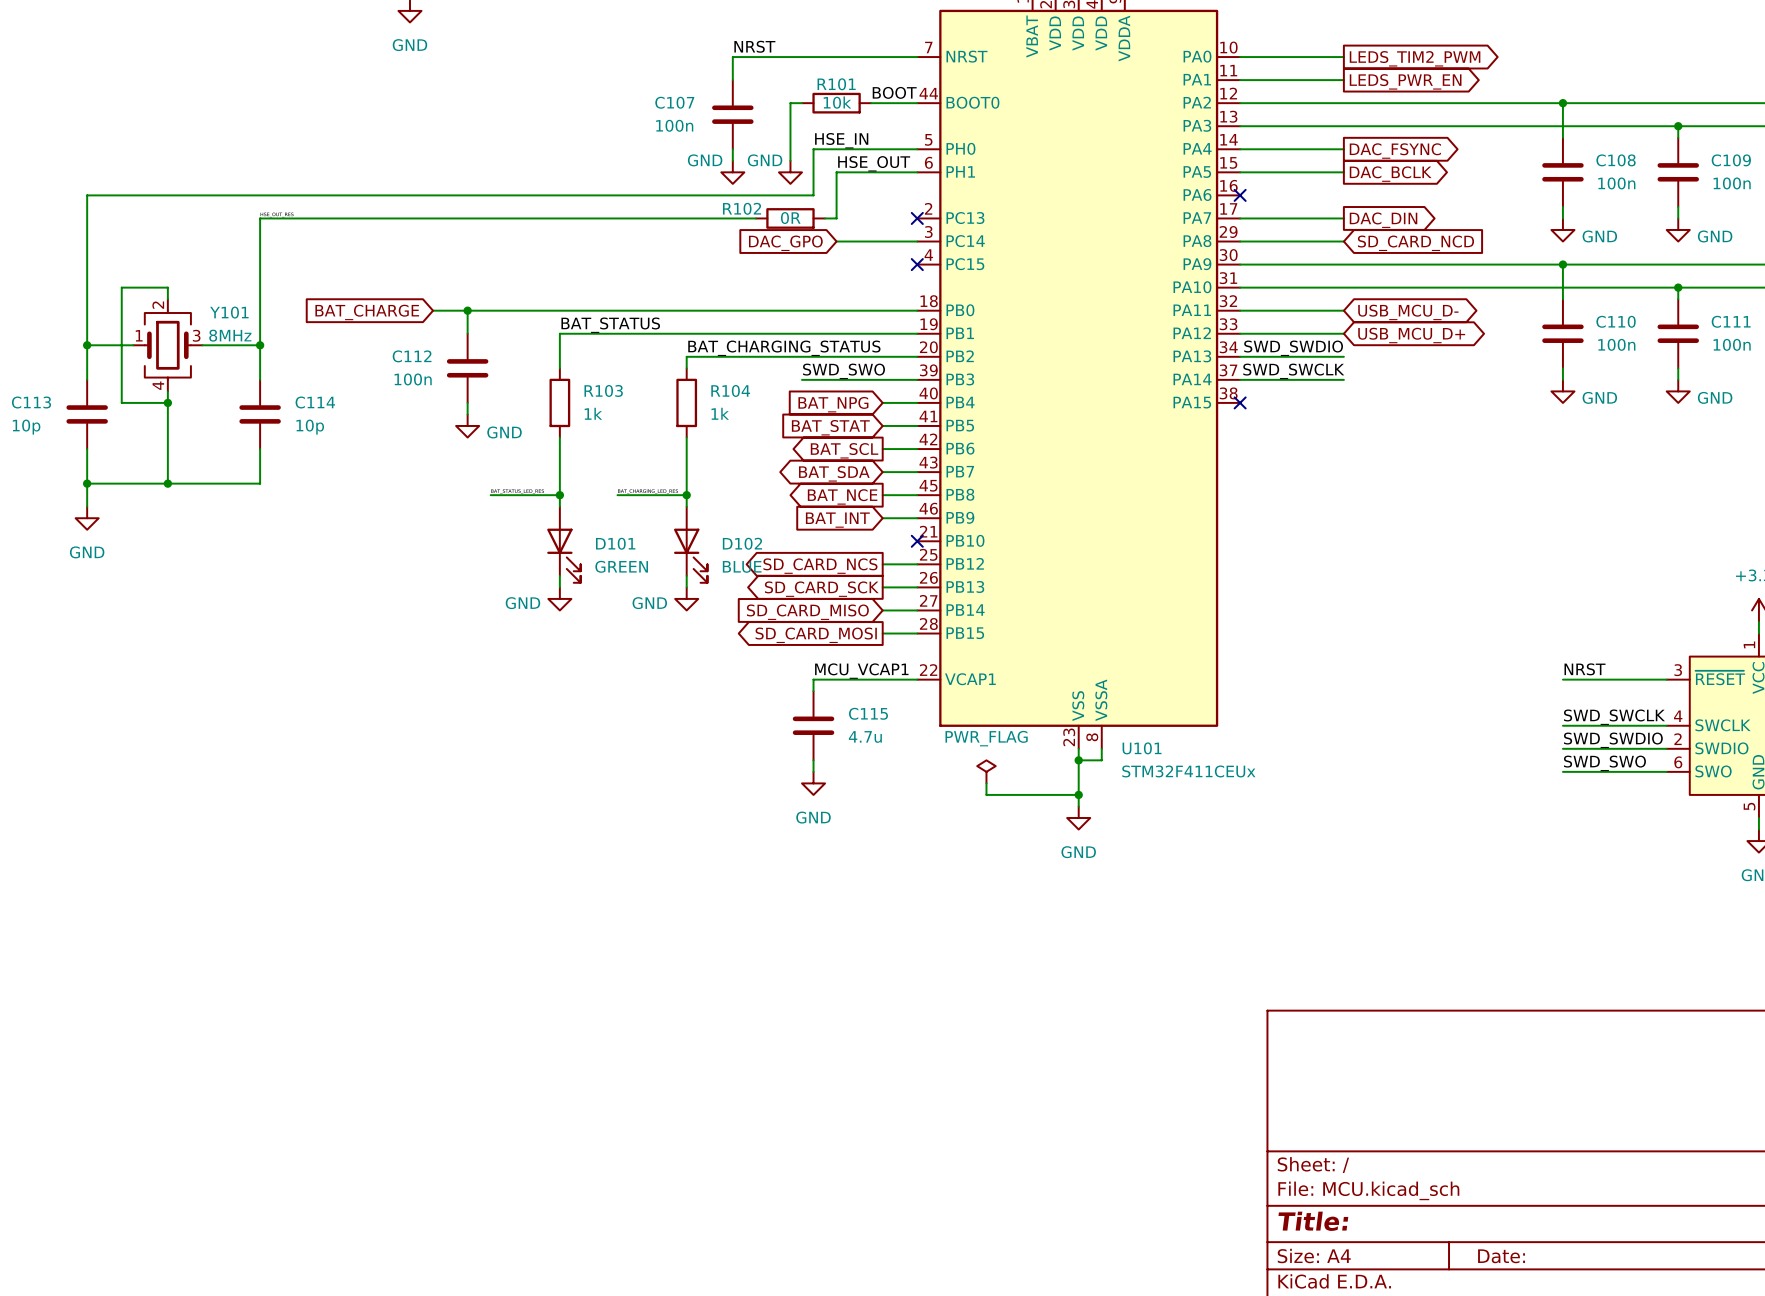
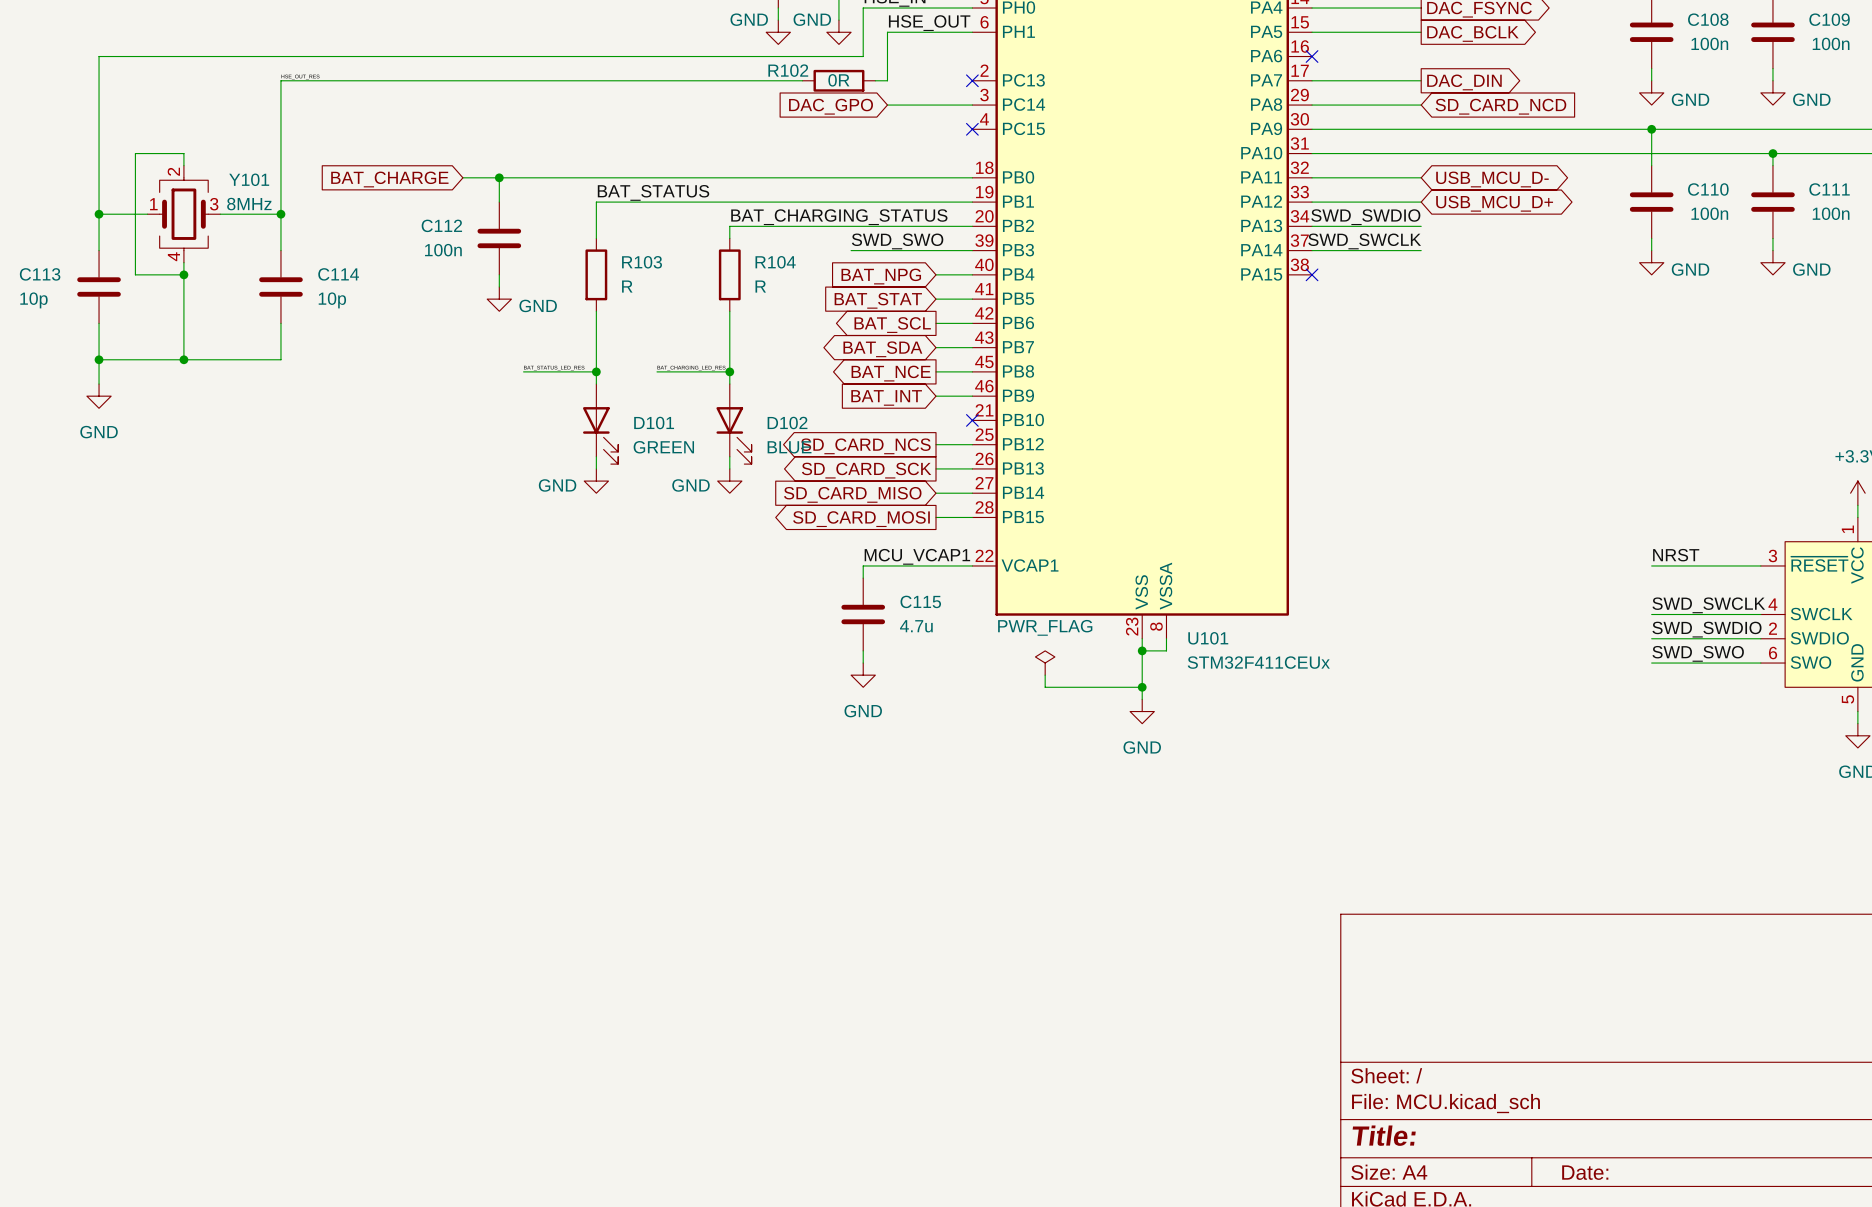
R103 value: 1k (593, 413) -> R (627, 286)
R104 value: 1k (720, 413) -> R (760, 286)

